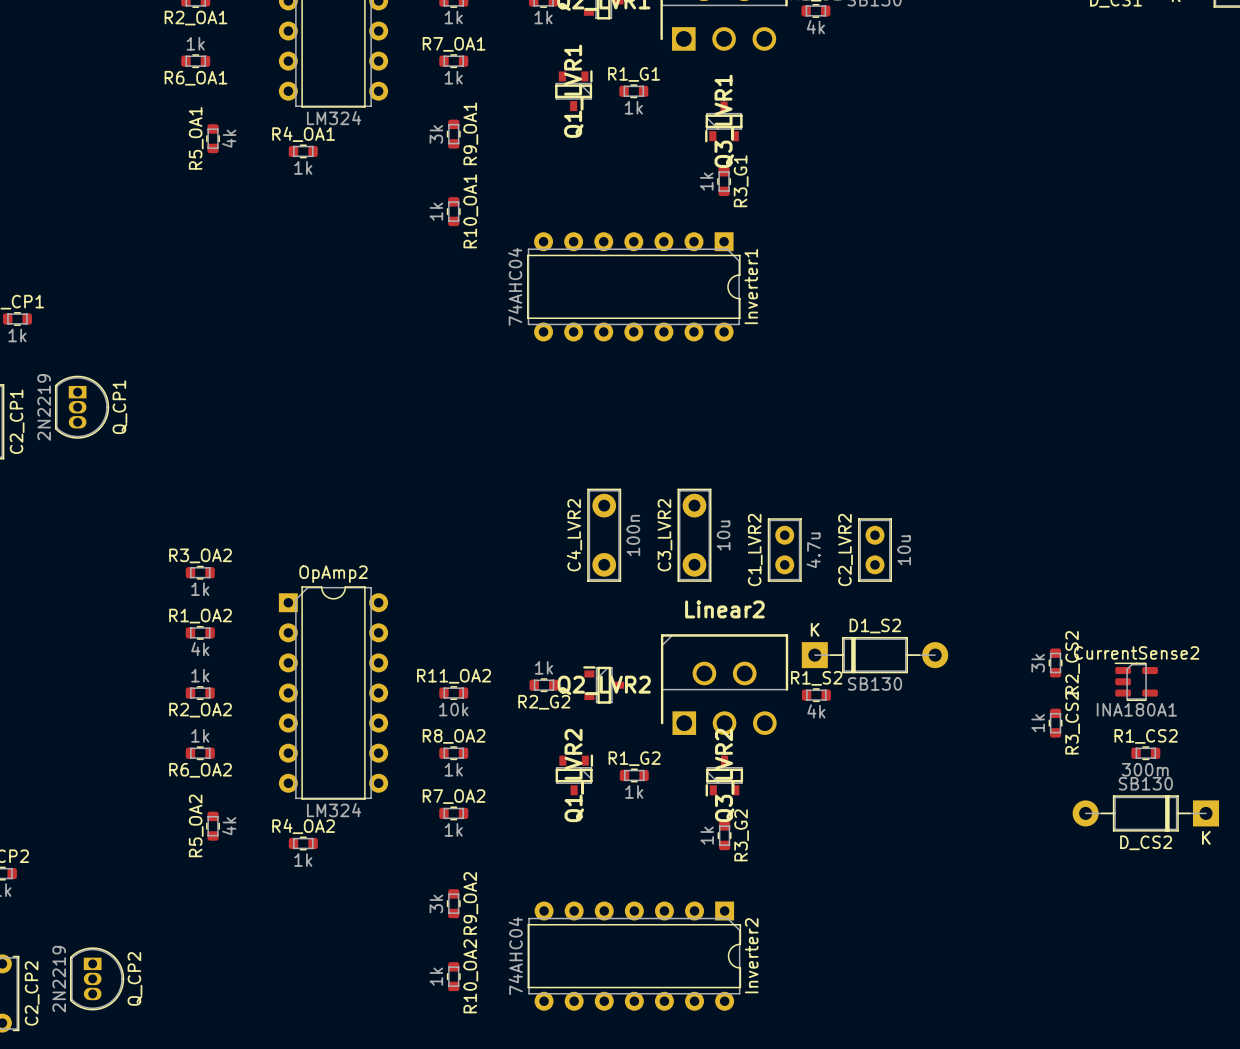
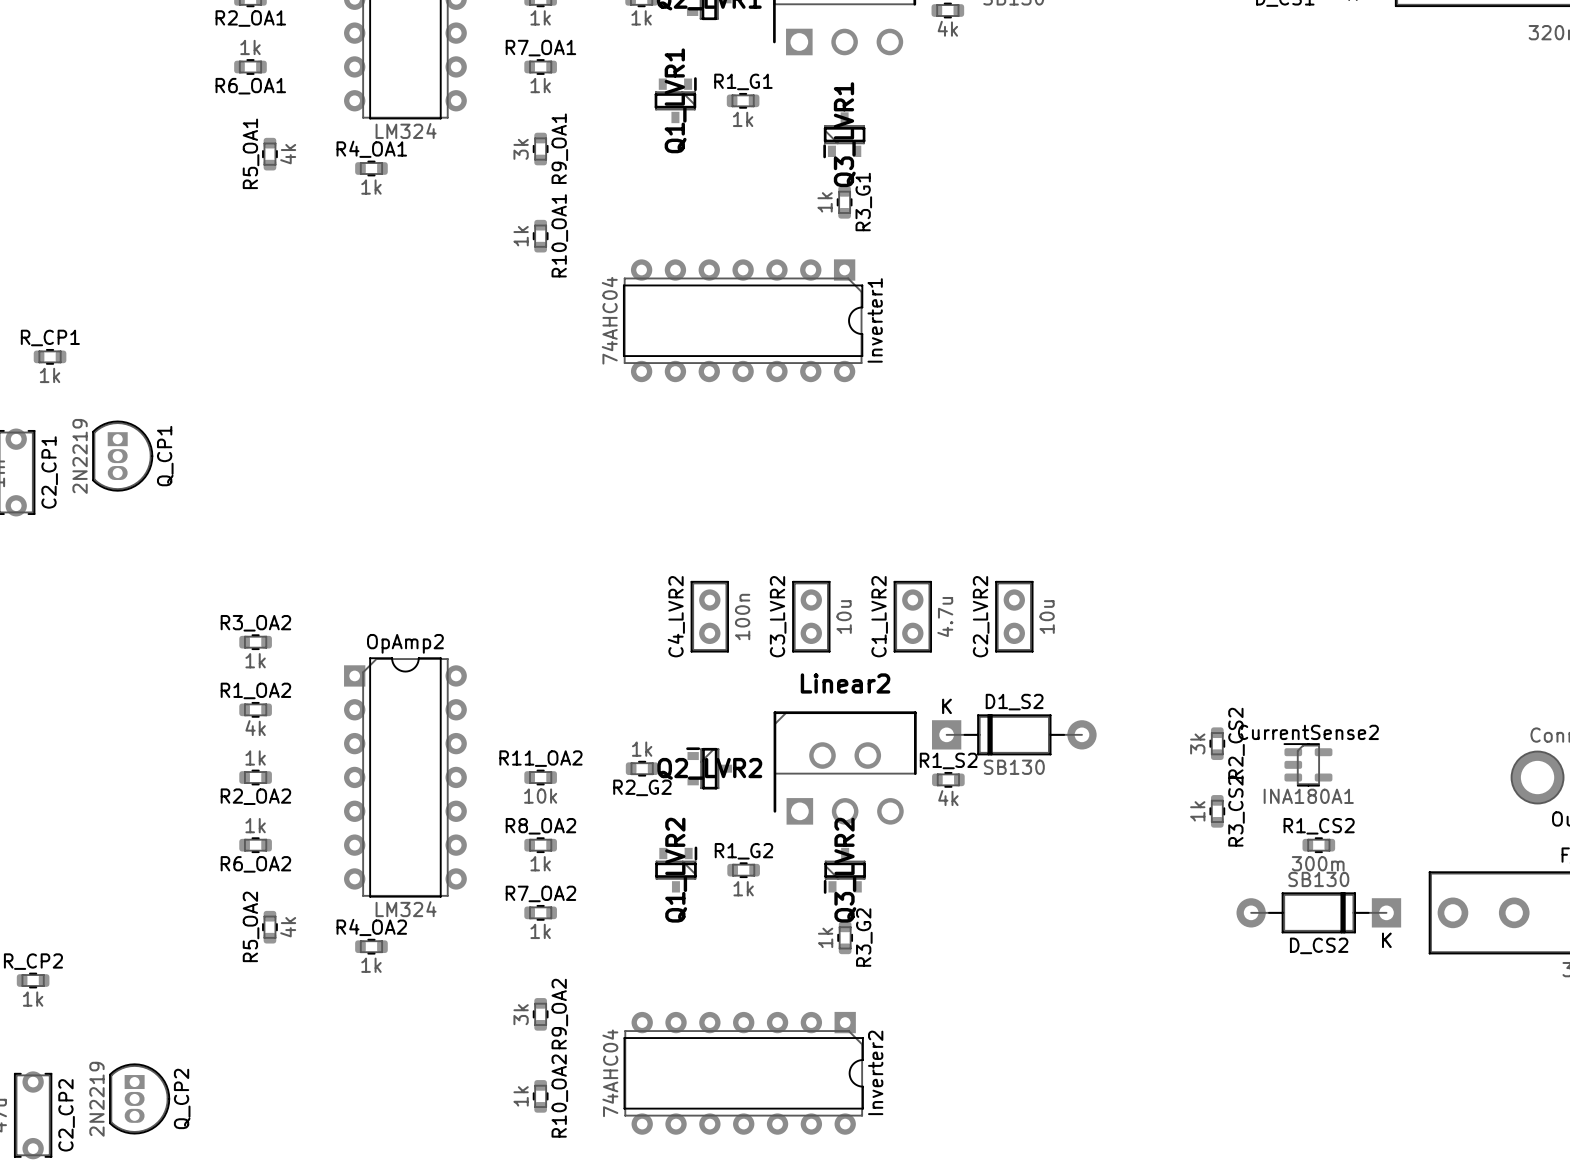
C4_LVR2 footprint: [587, 488, 622, 582] -> [690, 581, 729, 653]
C3_LVR2 footprint: [677, 488, 712, 582] -> [792, 581, 831, 653]

